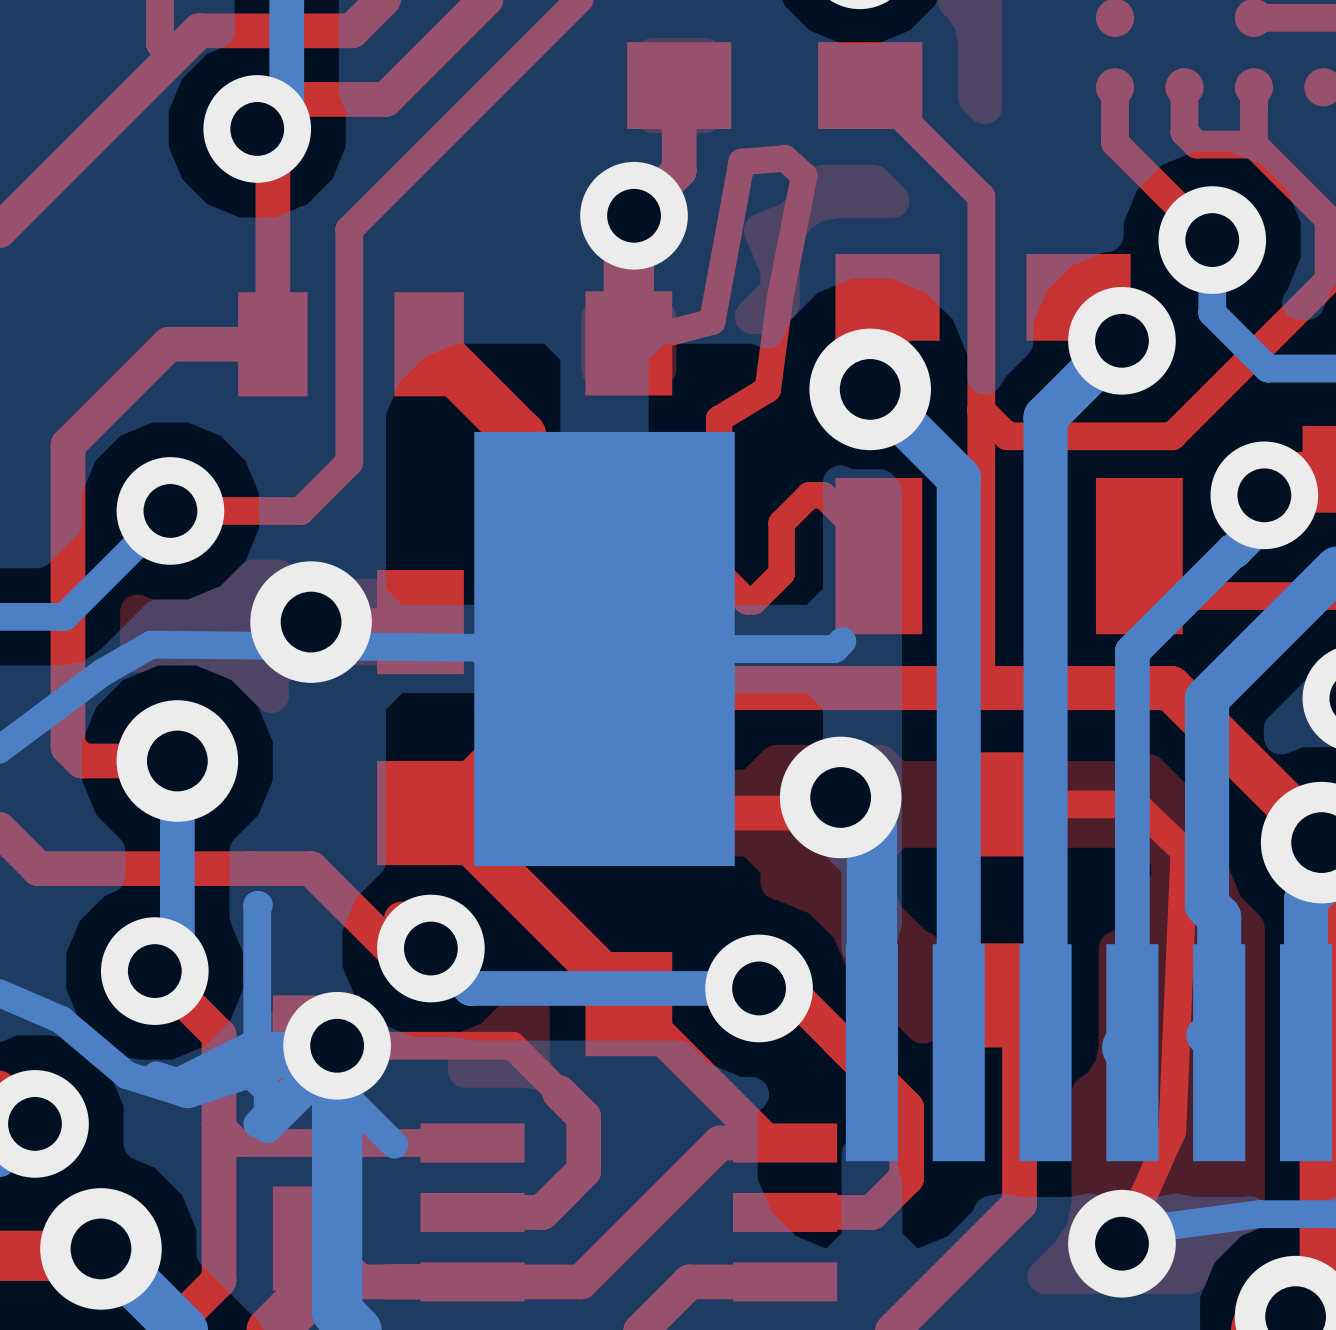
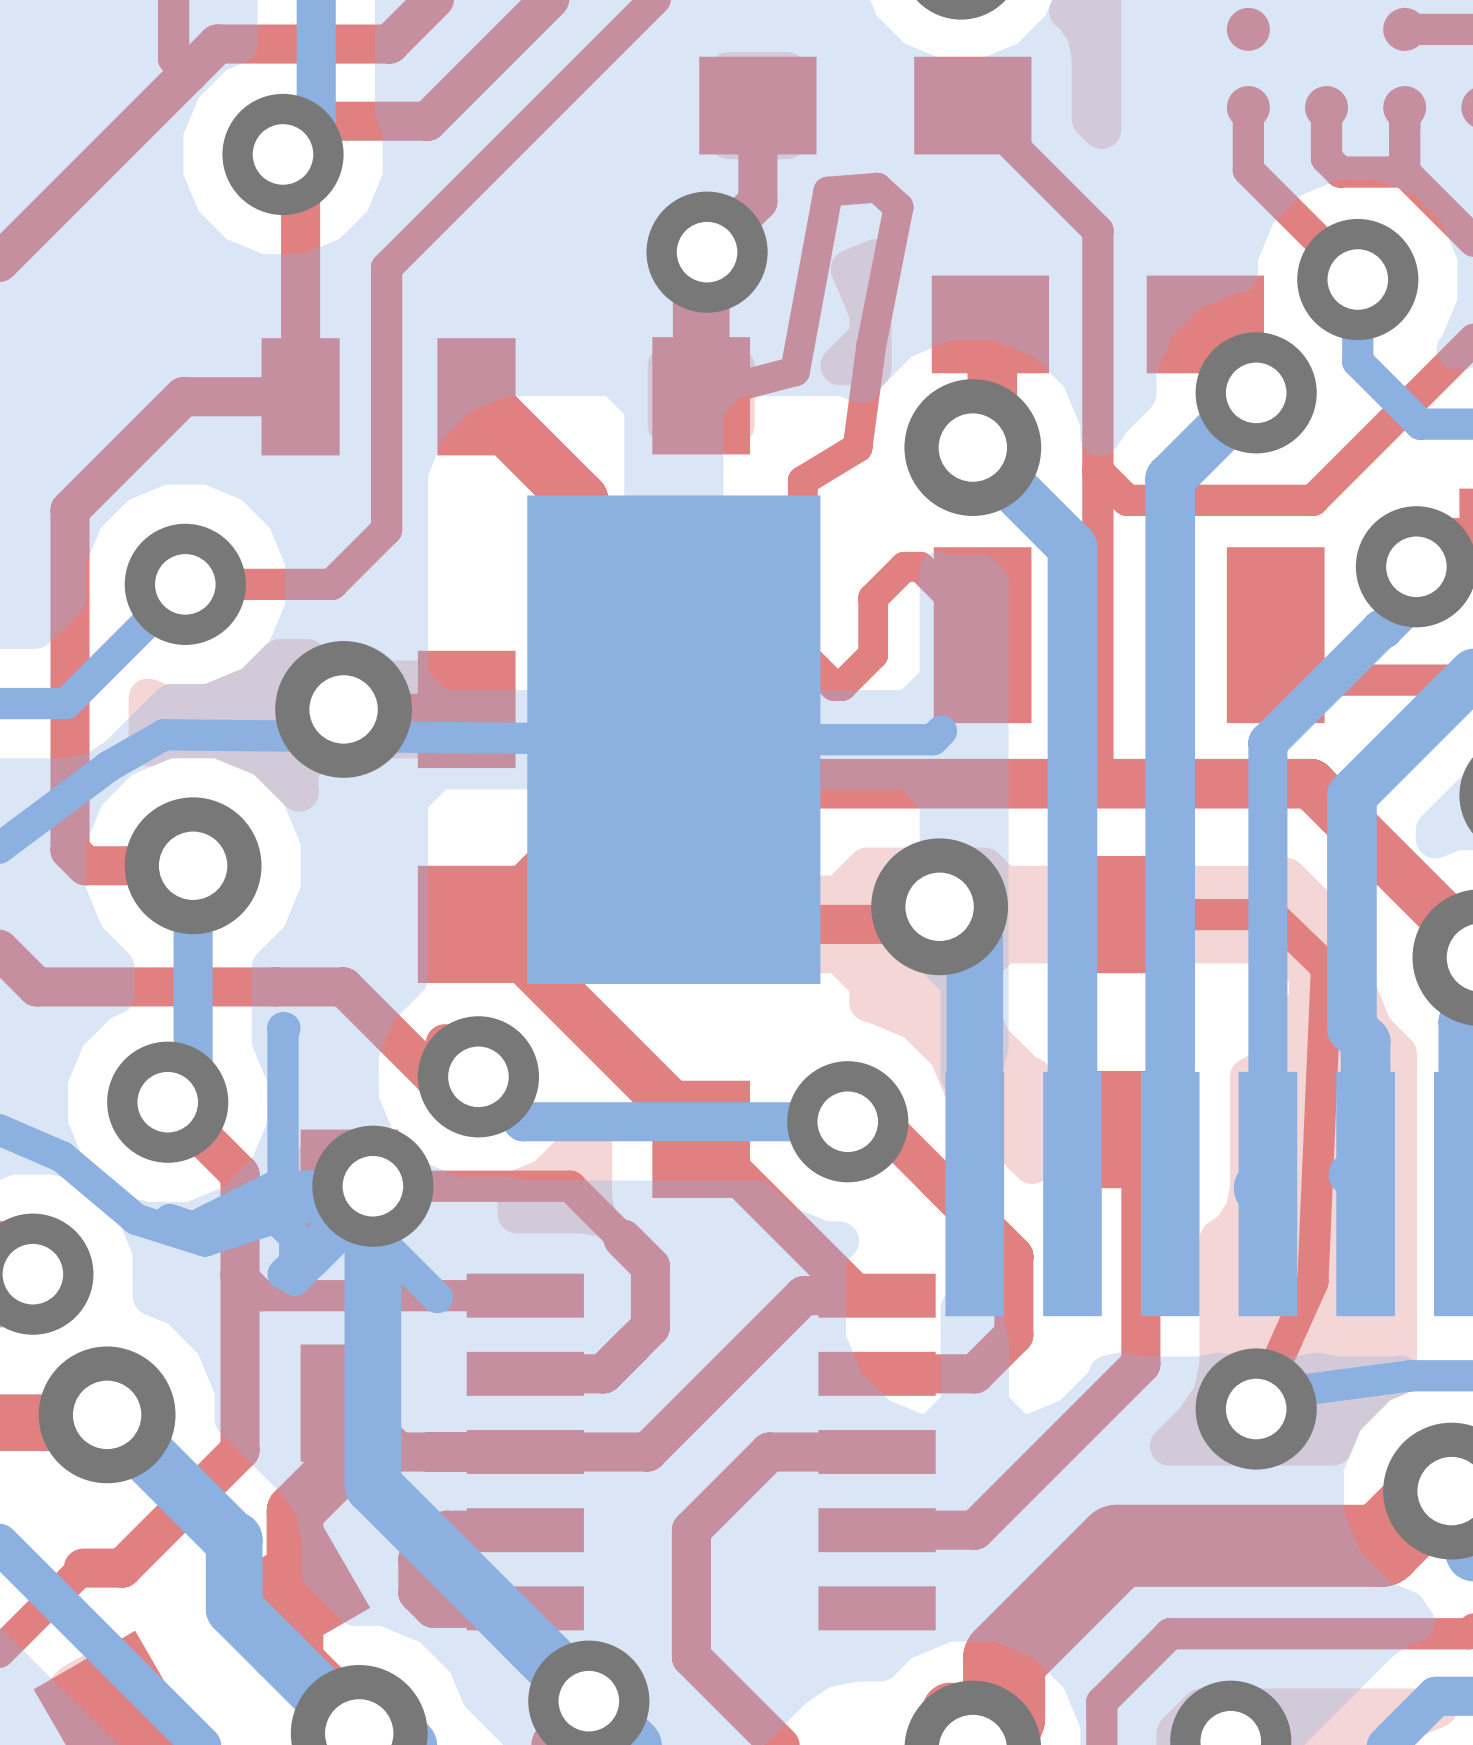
part position: (983, 297) -> (1097, 324)

